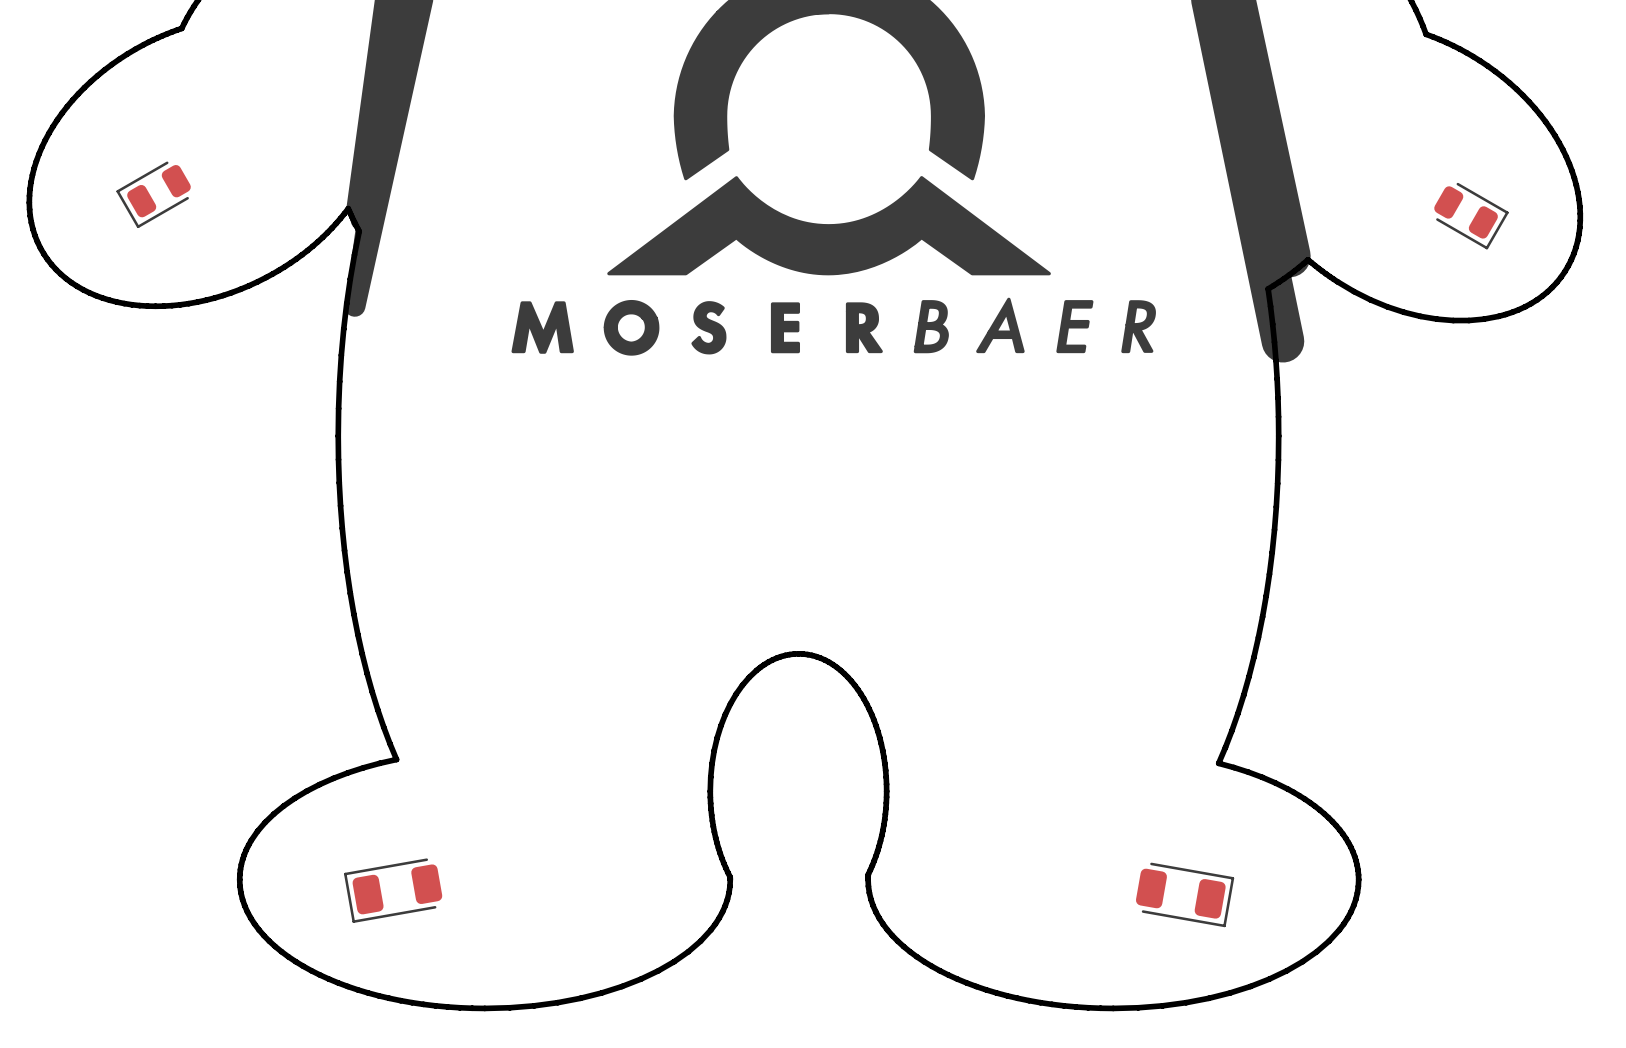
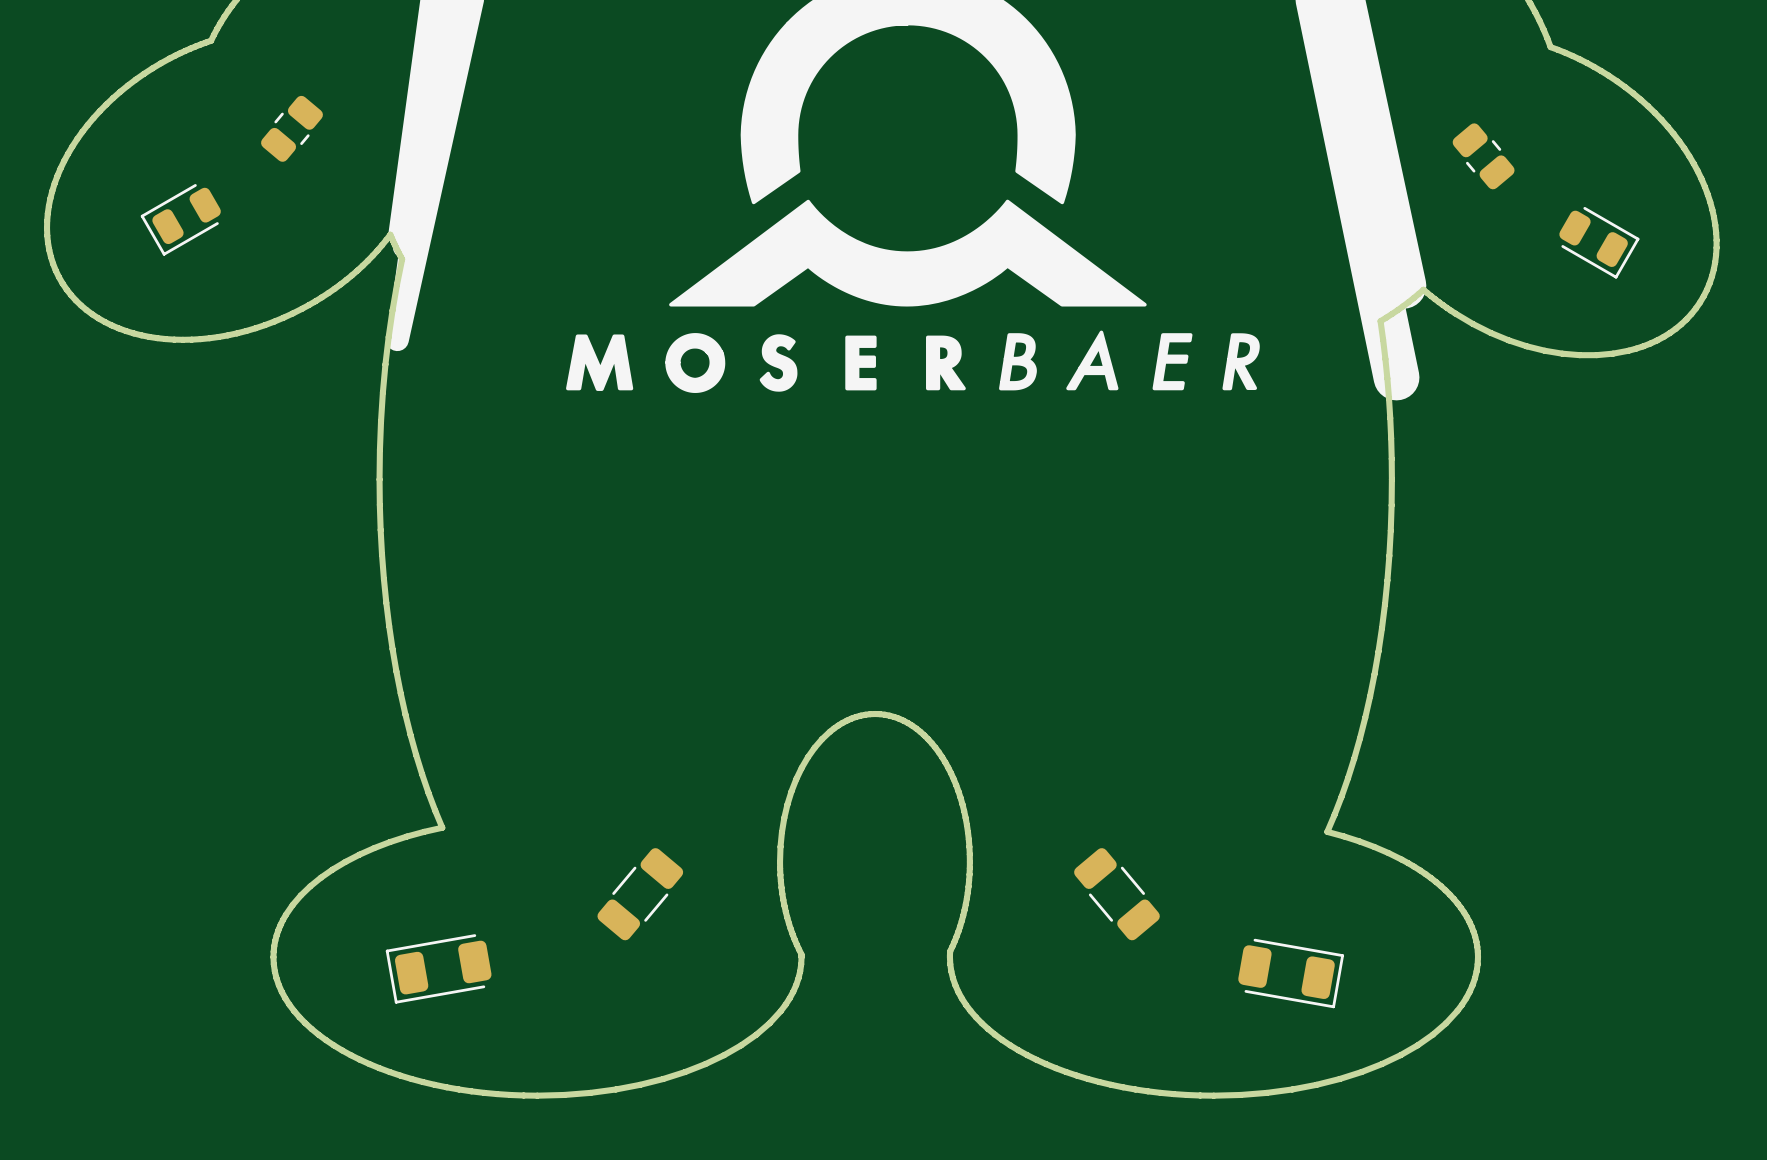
part: none -> (291, 128)
part: none -> (1483, 156)
part: none -> (640, 894)
part: none -> (1116, 894)

